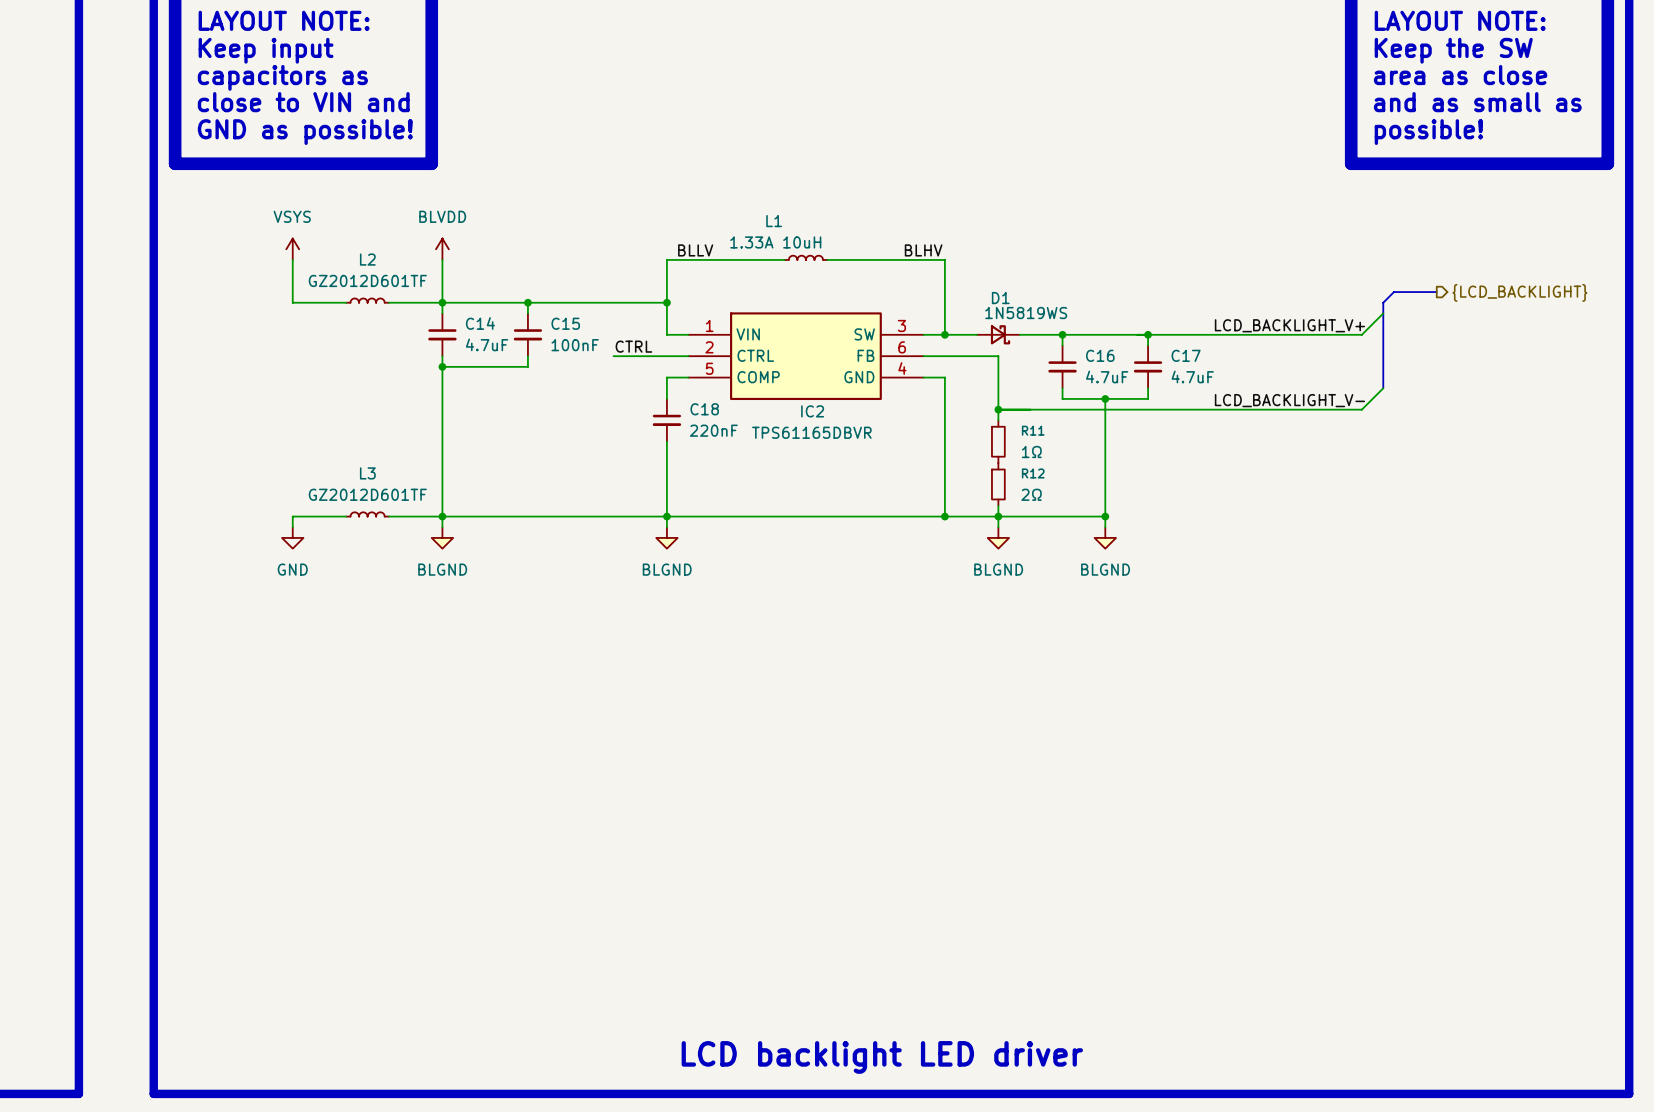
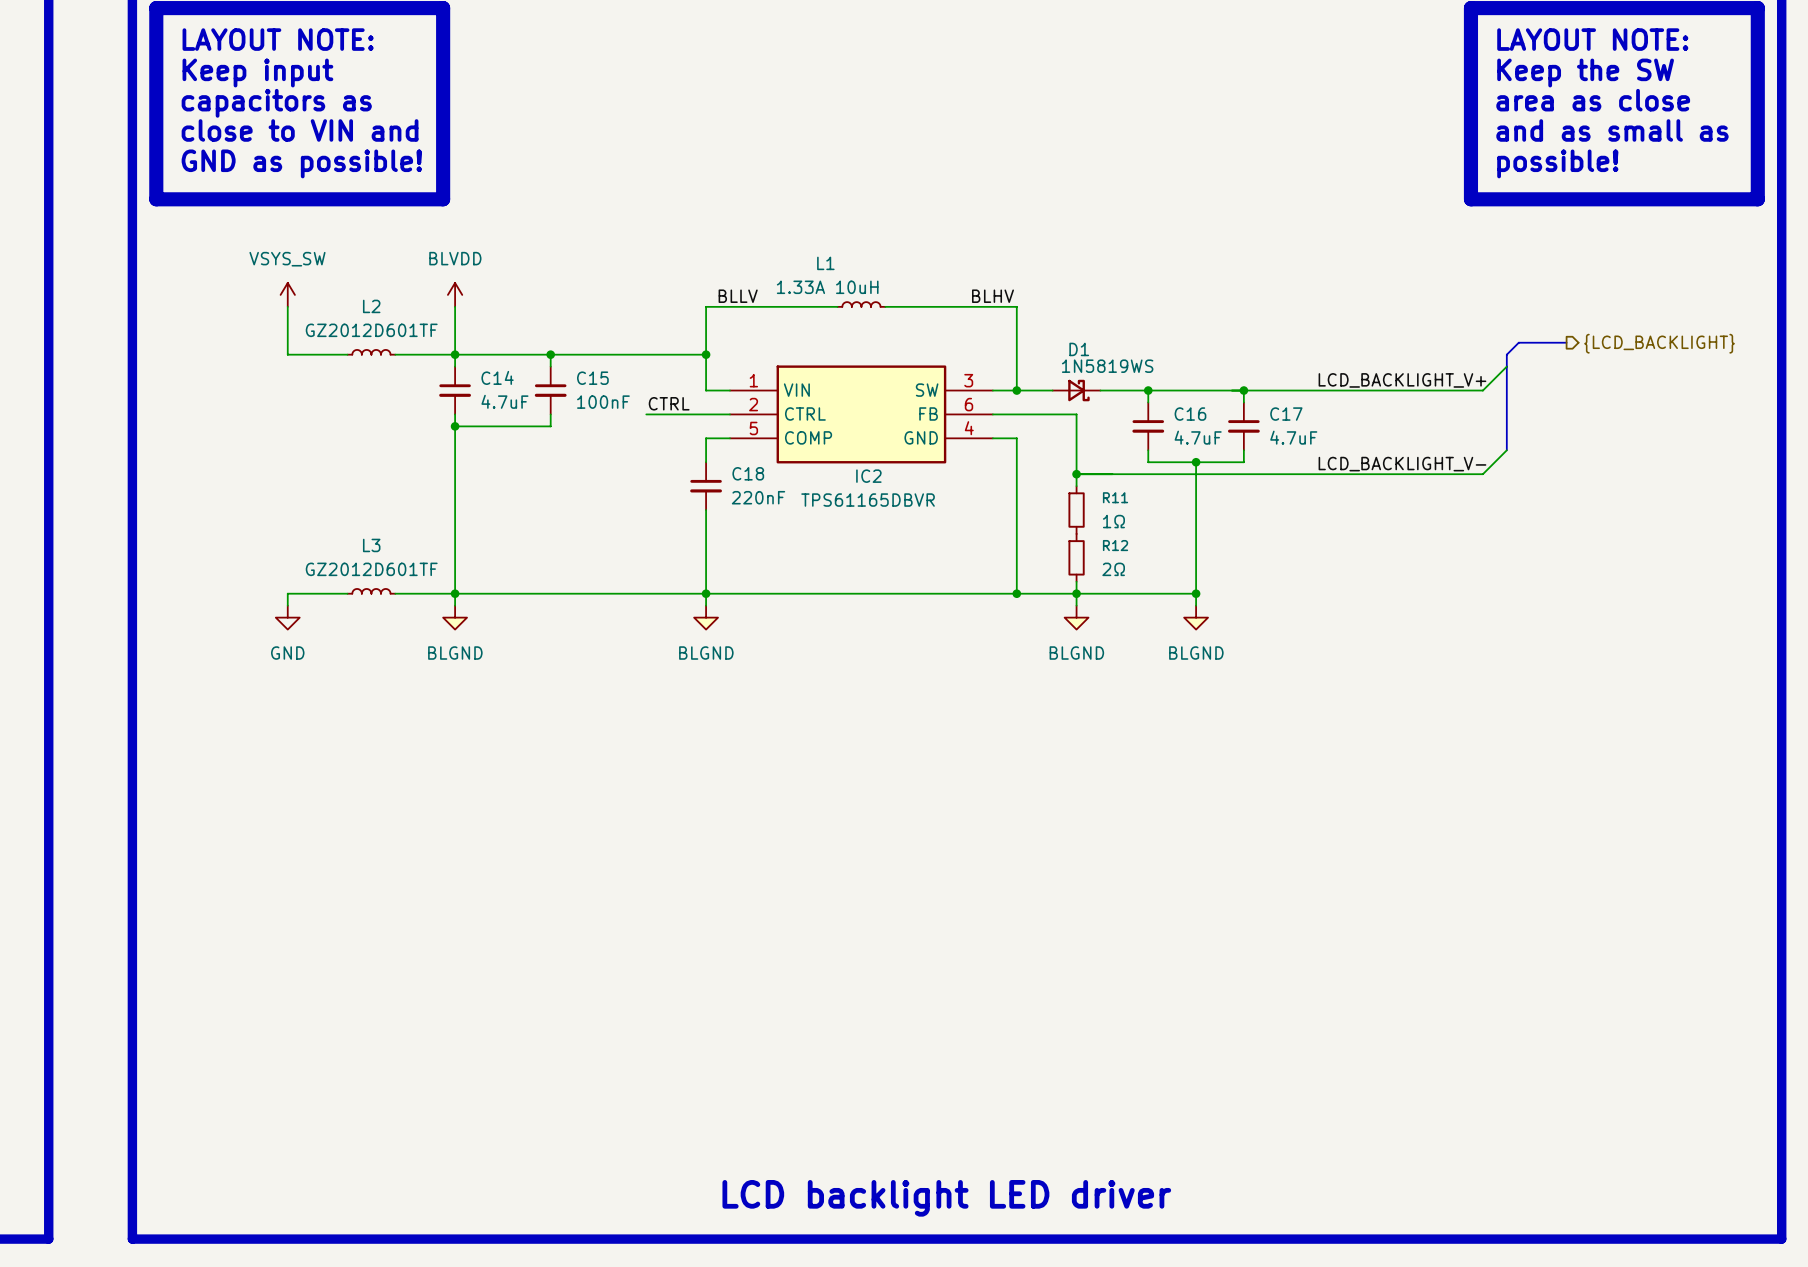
power symbol: VSYS (292, 249) -> VSYS_SW (287, 294)

